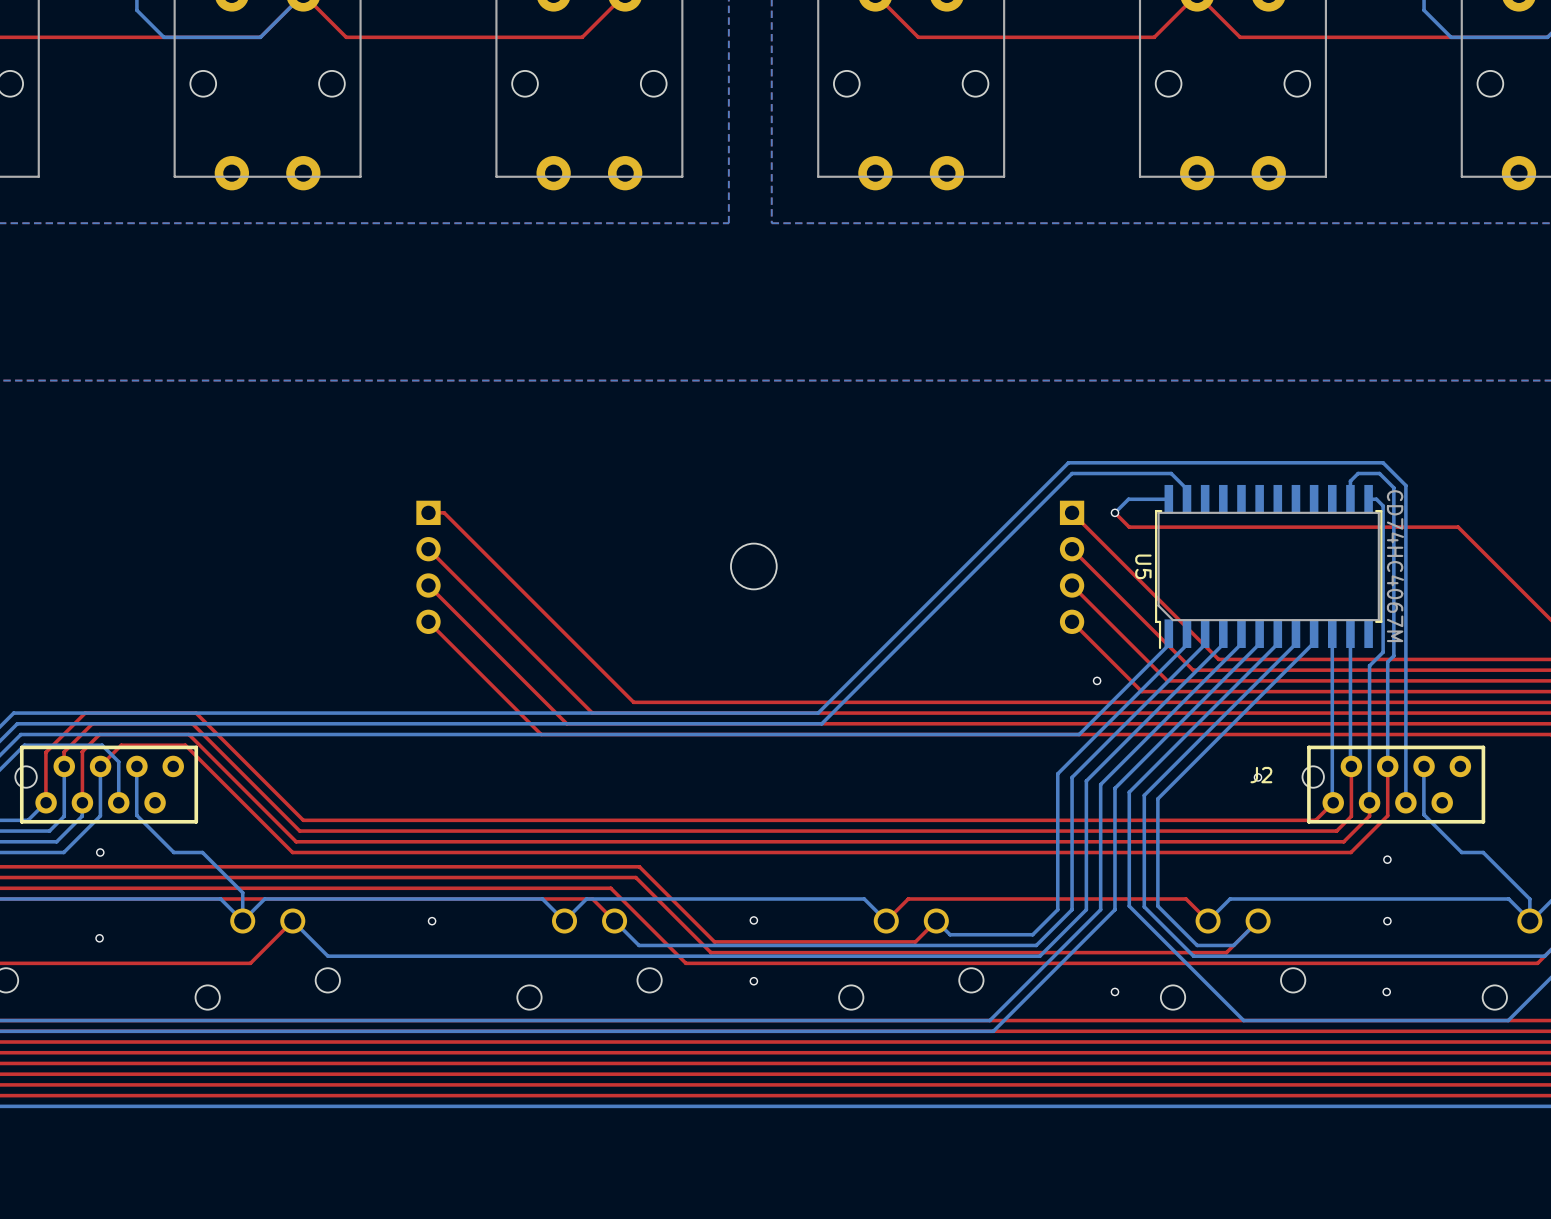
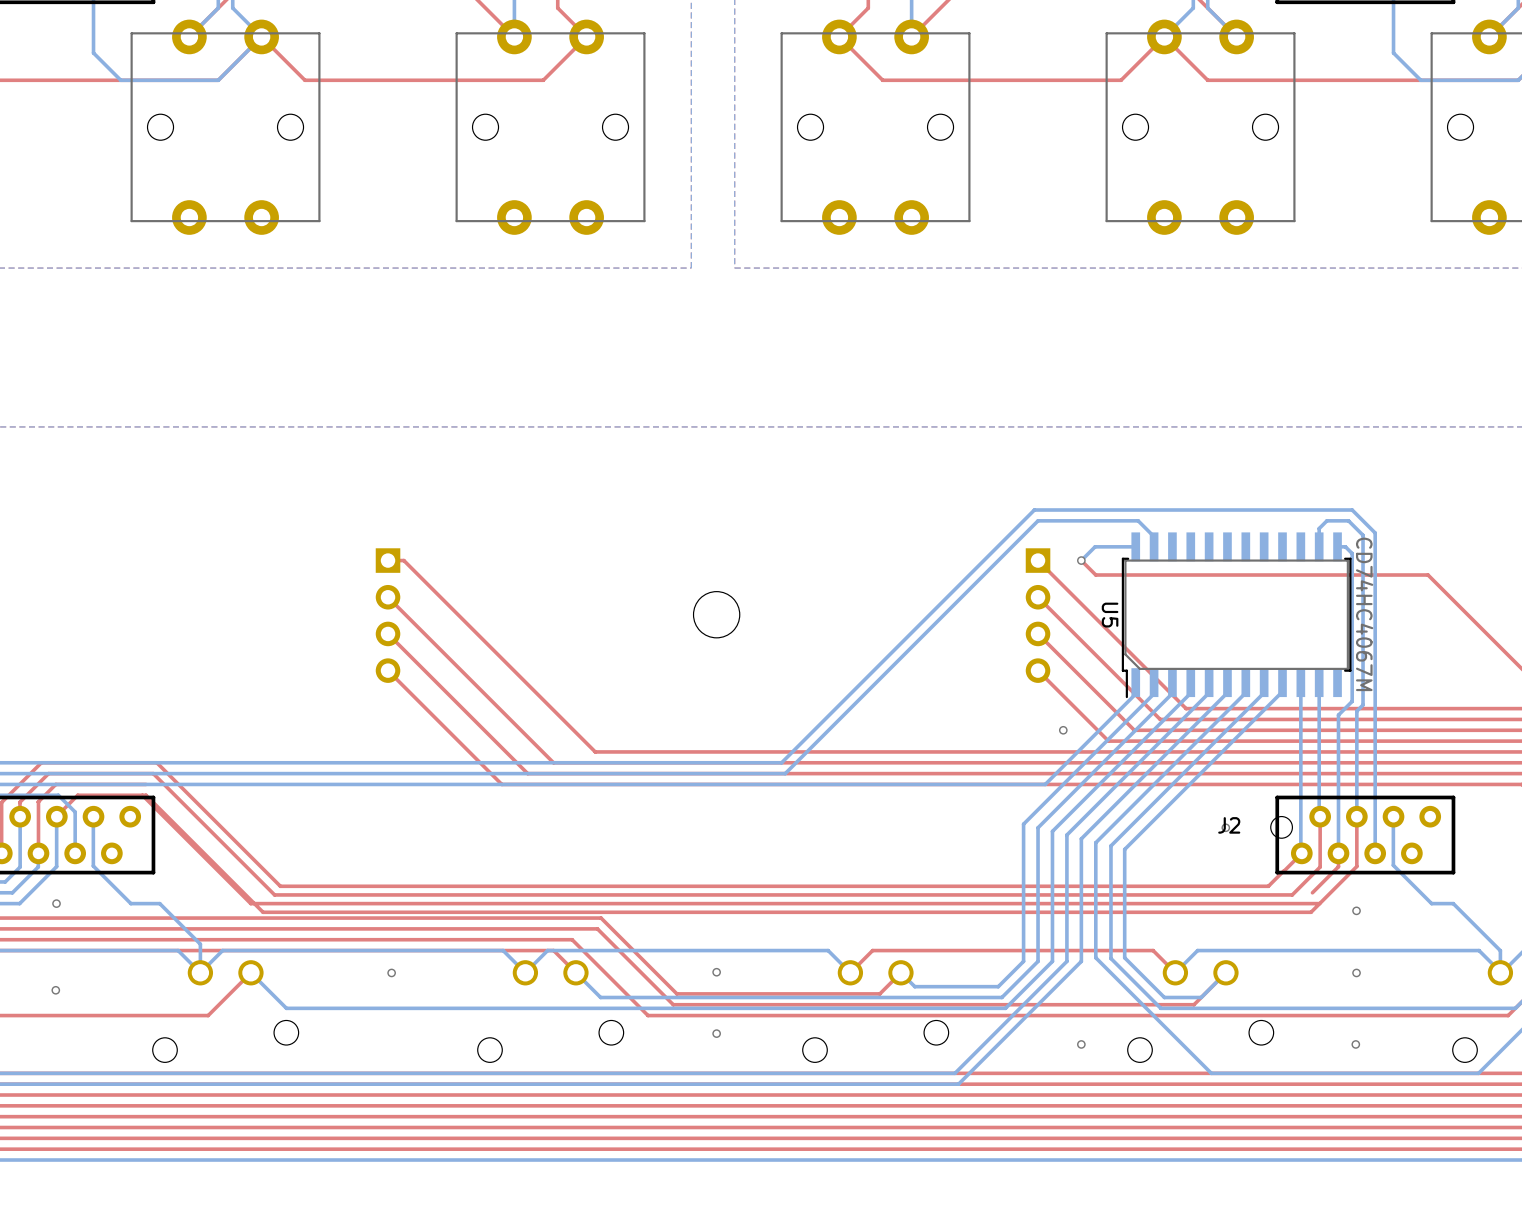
top track: (196, 713) (303, 820) (1315, 820) -> (153, 762) (156, 762) (280, 886) (1268, 886) (1283, 871)
top track: (192, 723) (299, 831) (1336, 831) -> (149, 773) (153, 773) (274, 894) (1292, 894) (1305, 881)
top track: (188, 734) (296, 841) (1343, 841) -> none
top track: none -> (142, 795) (146, 795) (263, 912) (1311, 912) (1319, 903)

